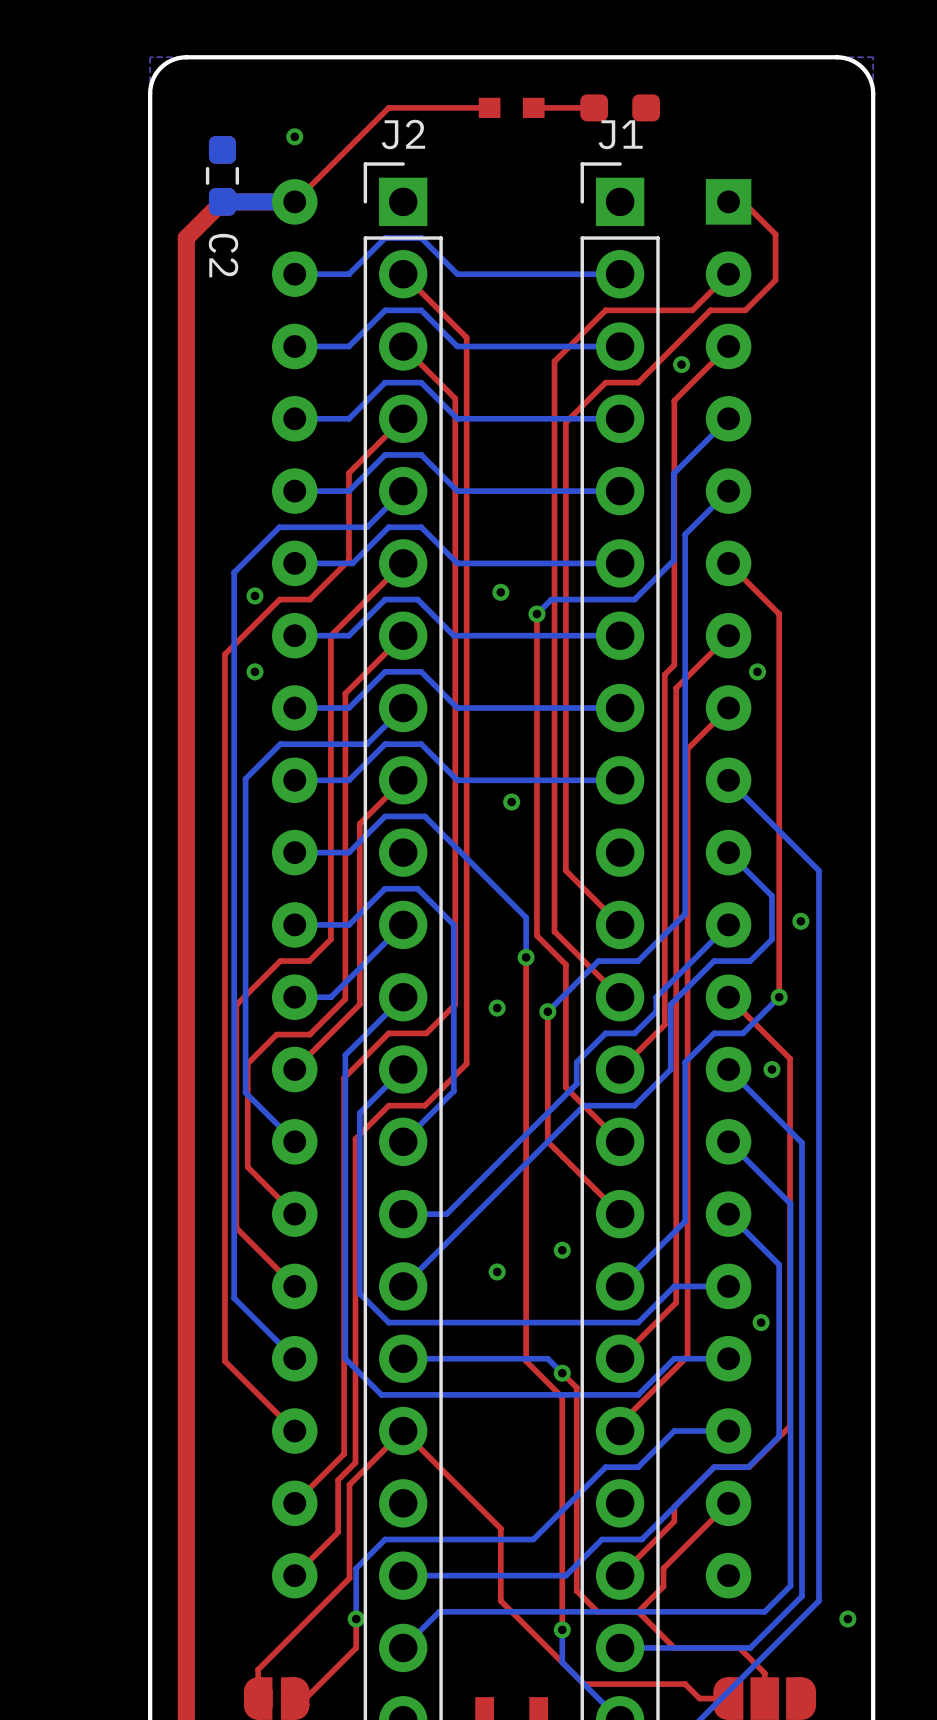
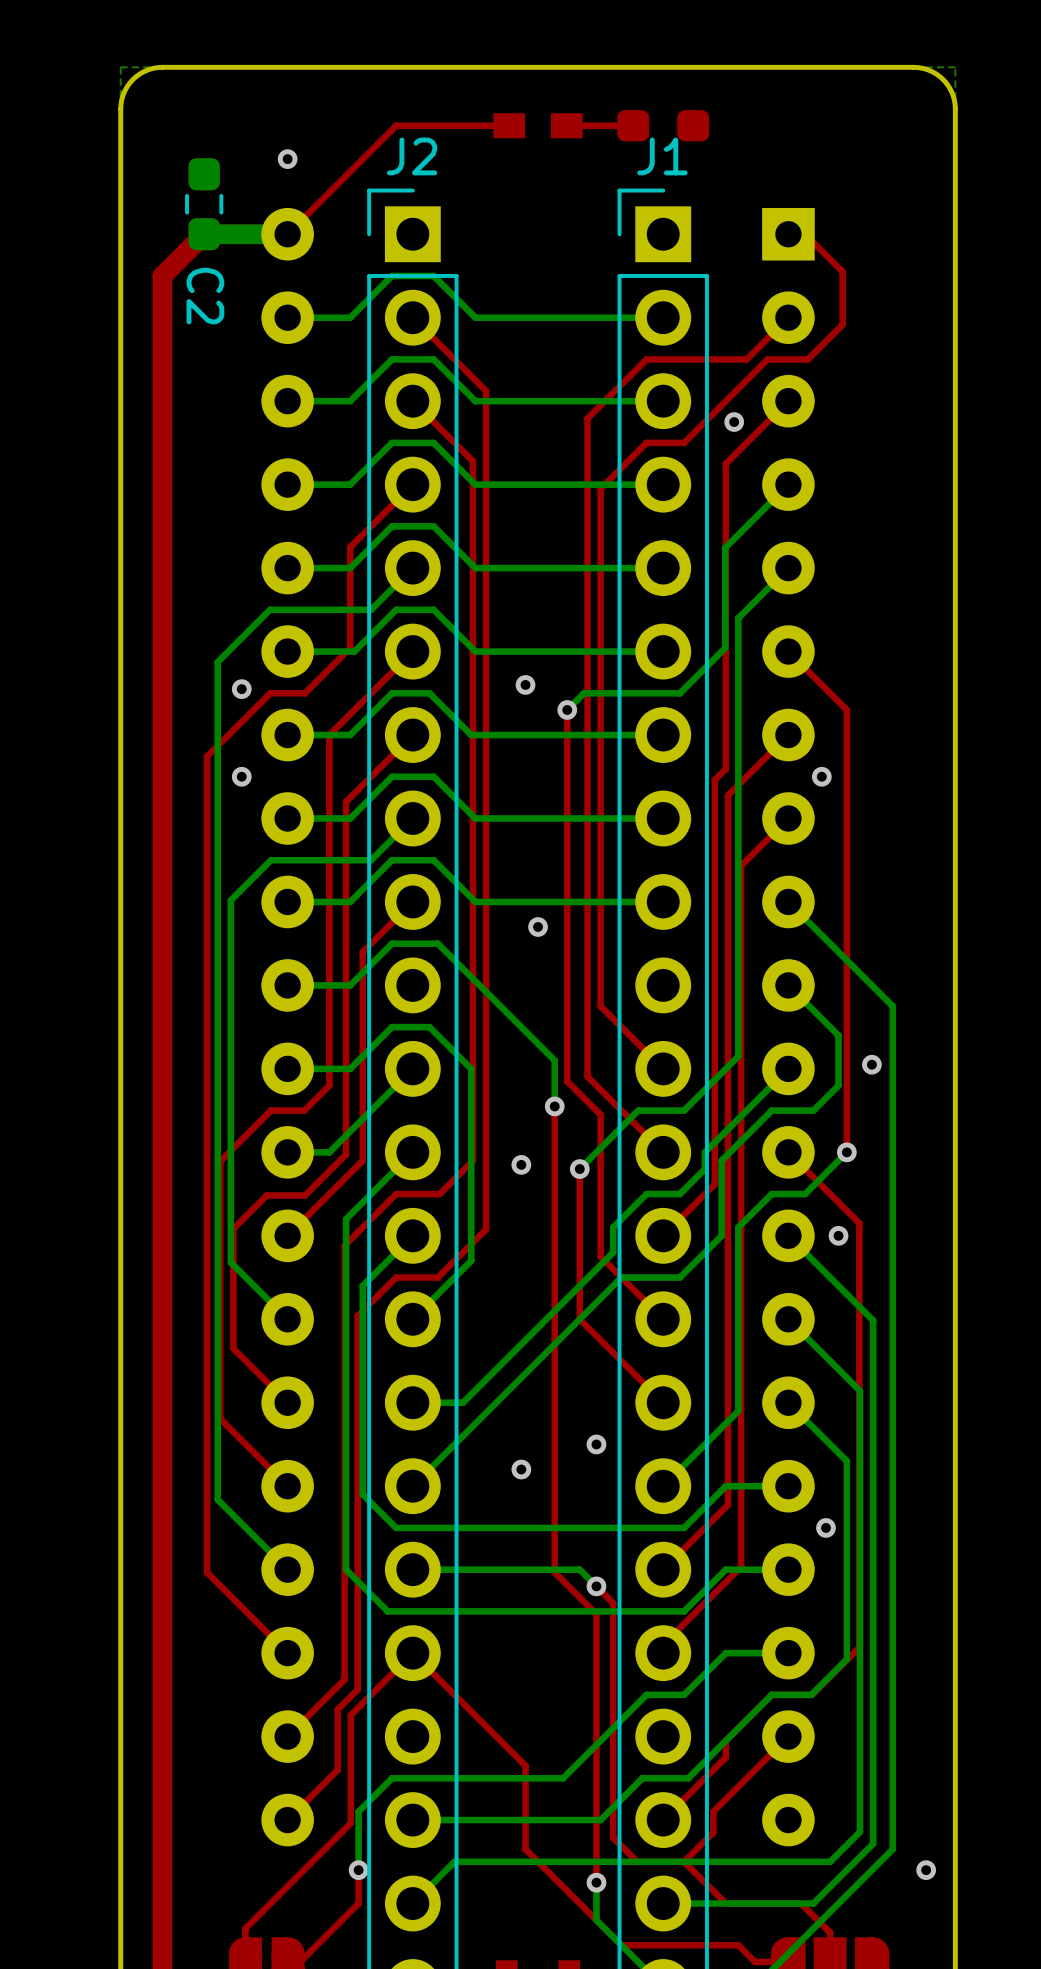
part footprint: [478, 97, 545, 119] -> [493, 113, 583, 139]

